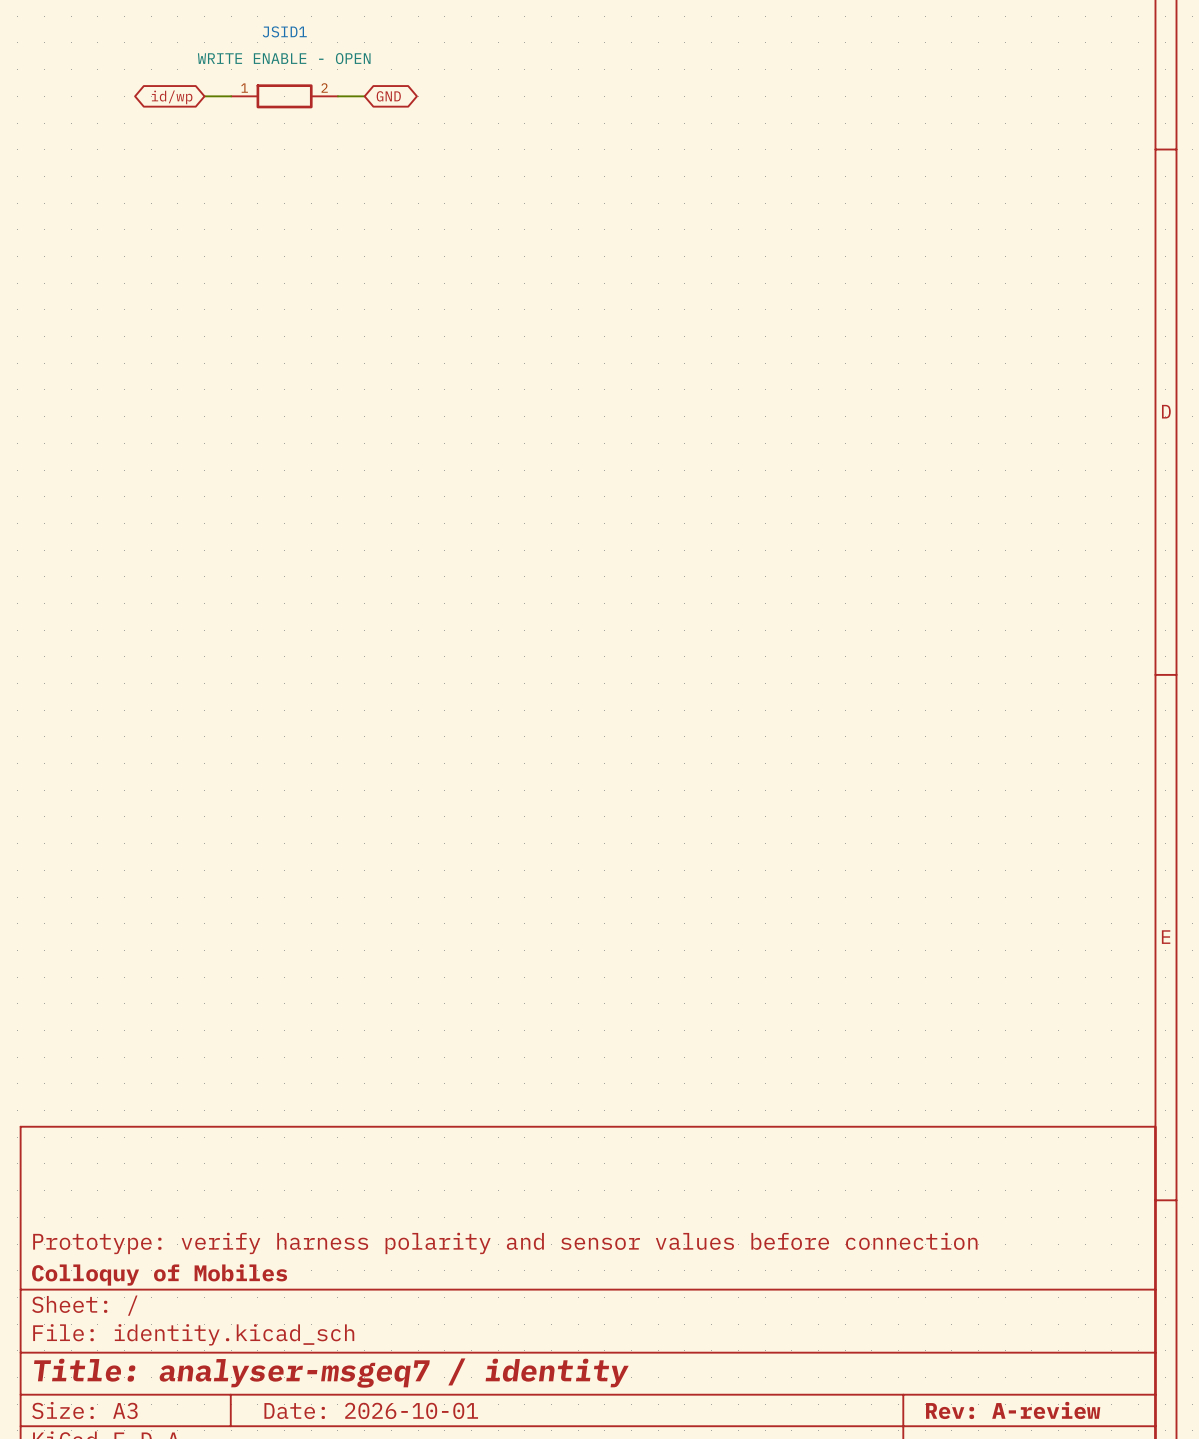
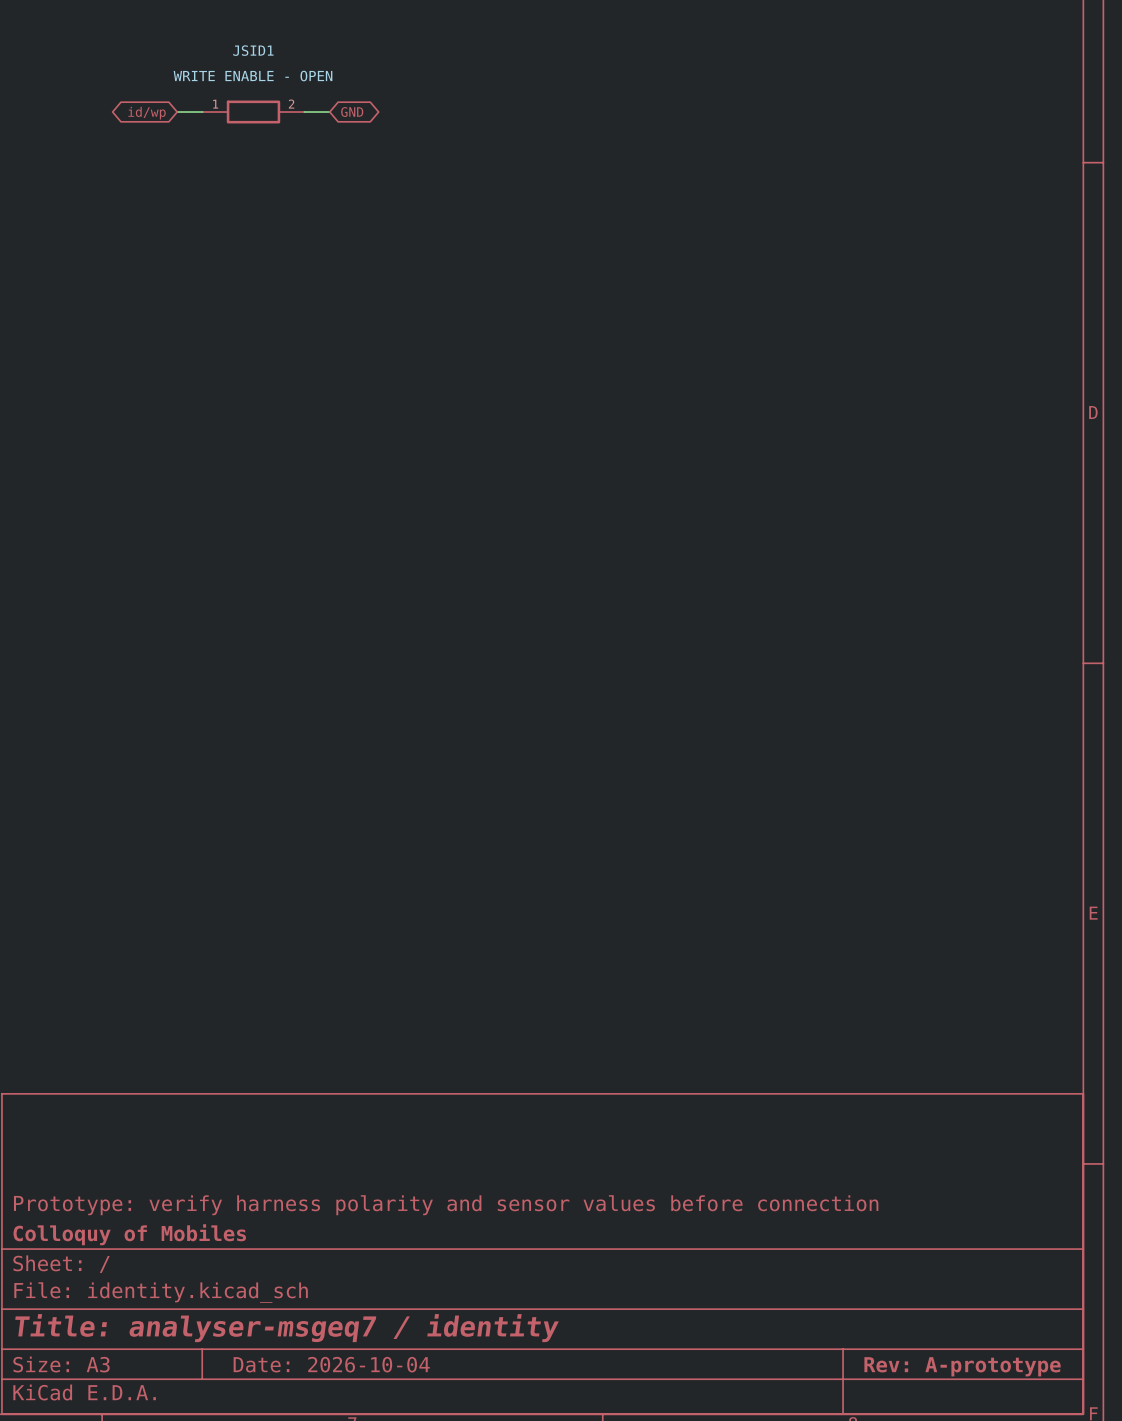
title block: Date: 2026-10-01 (371, 1410) -> Date: 2026-10-04 (331, 1364)
title block: Rev: A-review (1013, 1410) -> Rev: A-prototype (962, 1366)

